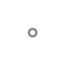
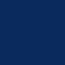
via: (32, 32) -> none

